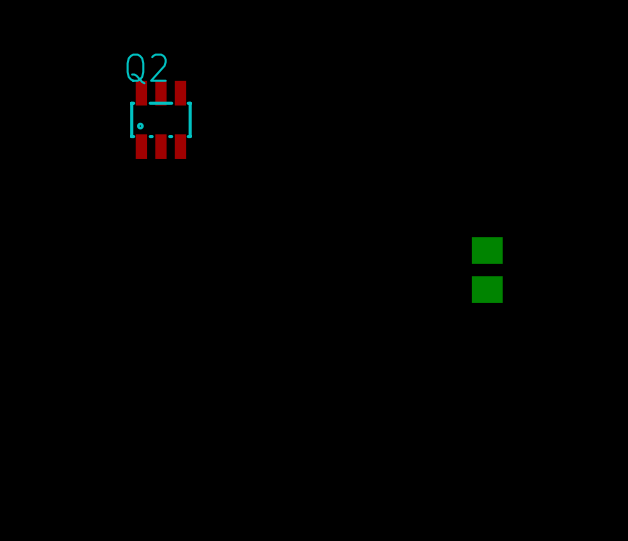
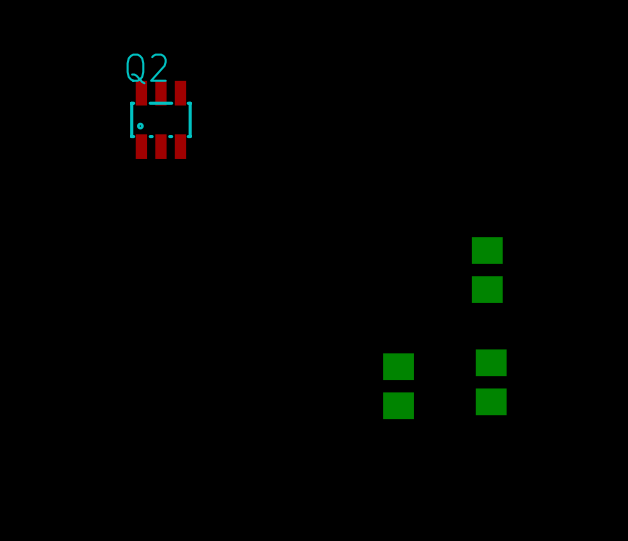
part: none -> (491, 382)
part: none -> (398, 386)

